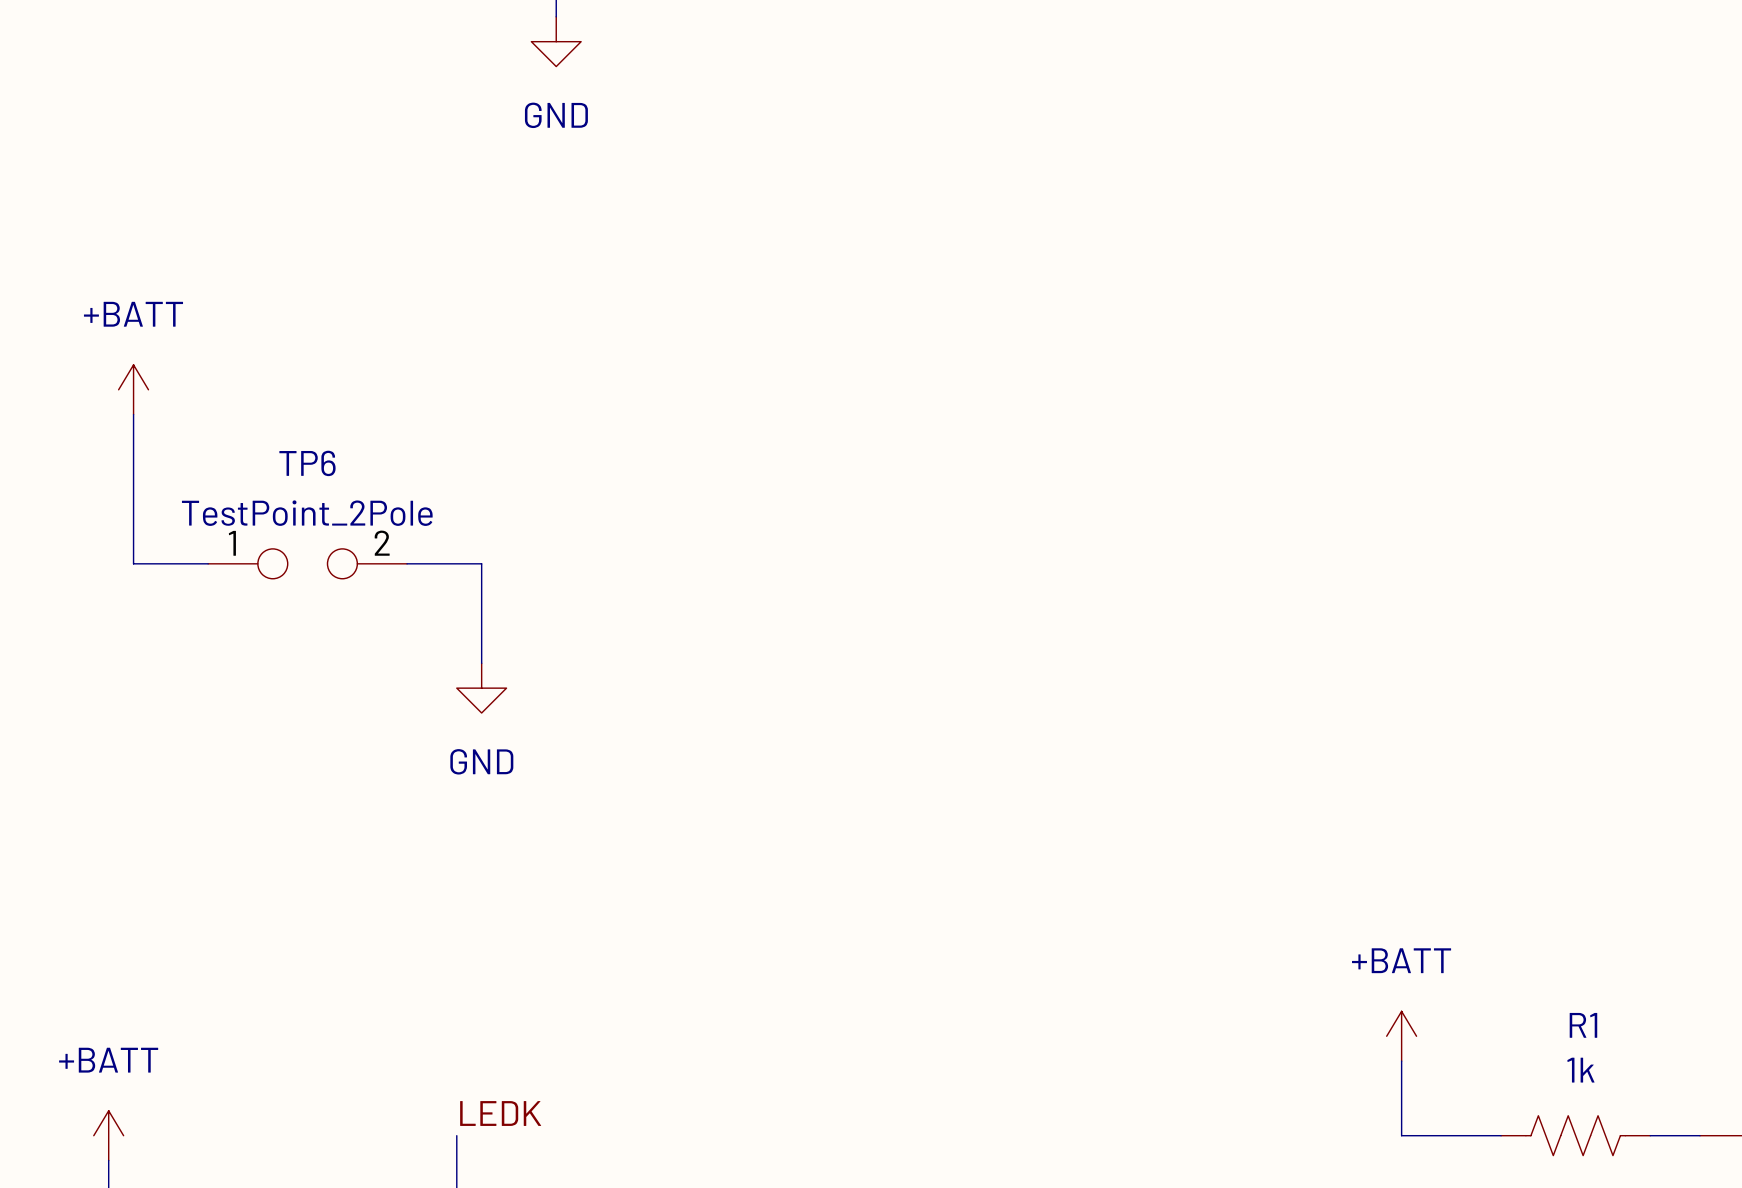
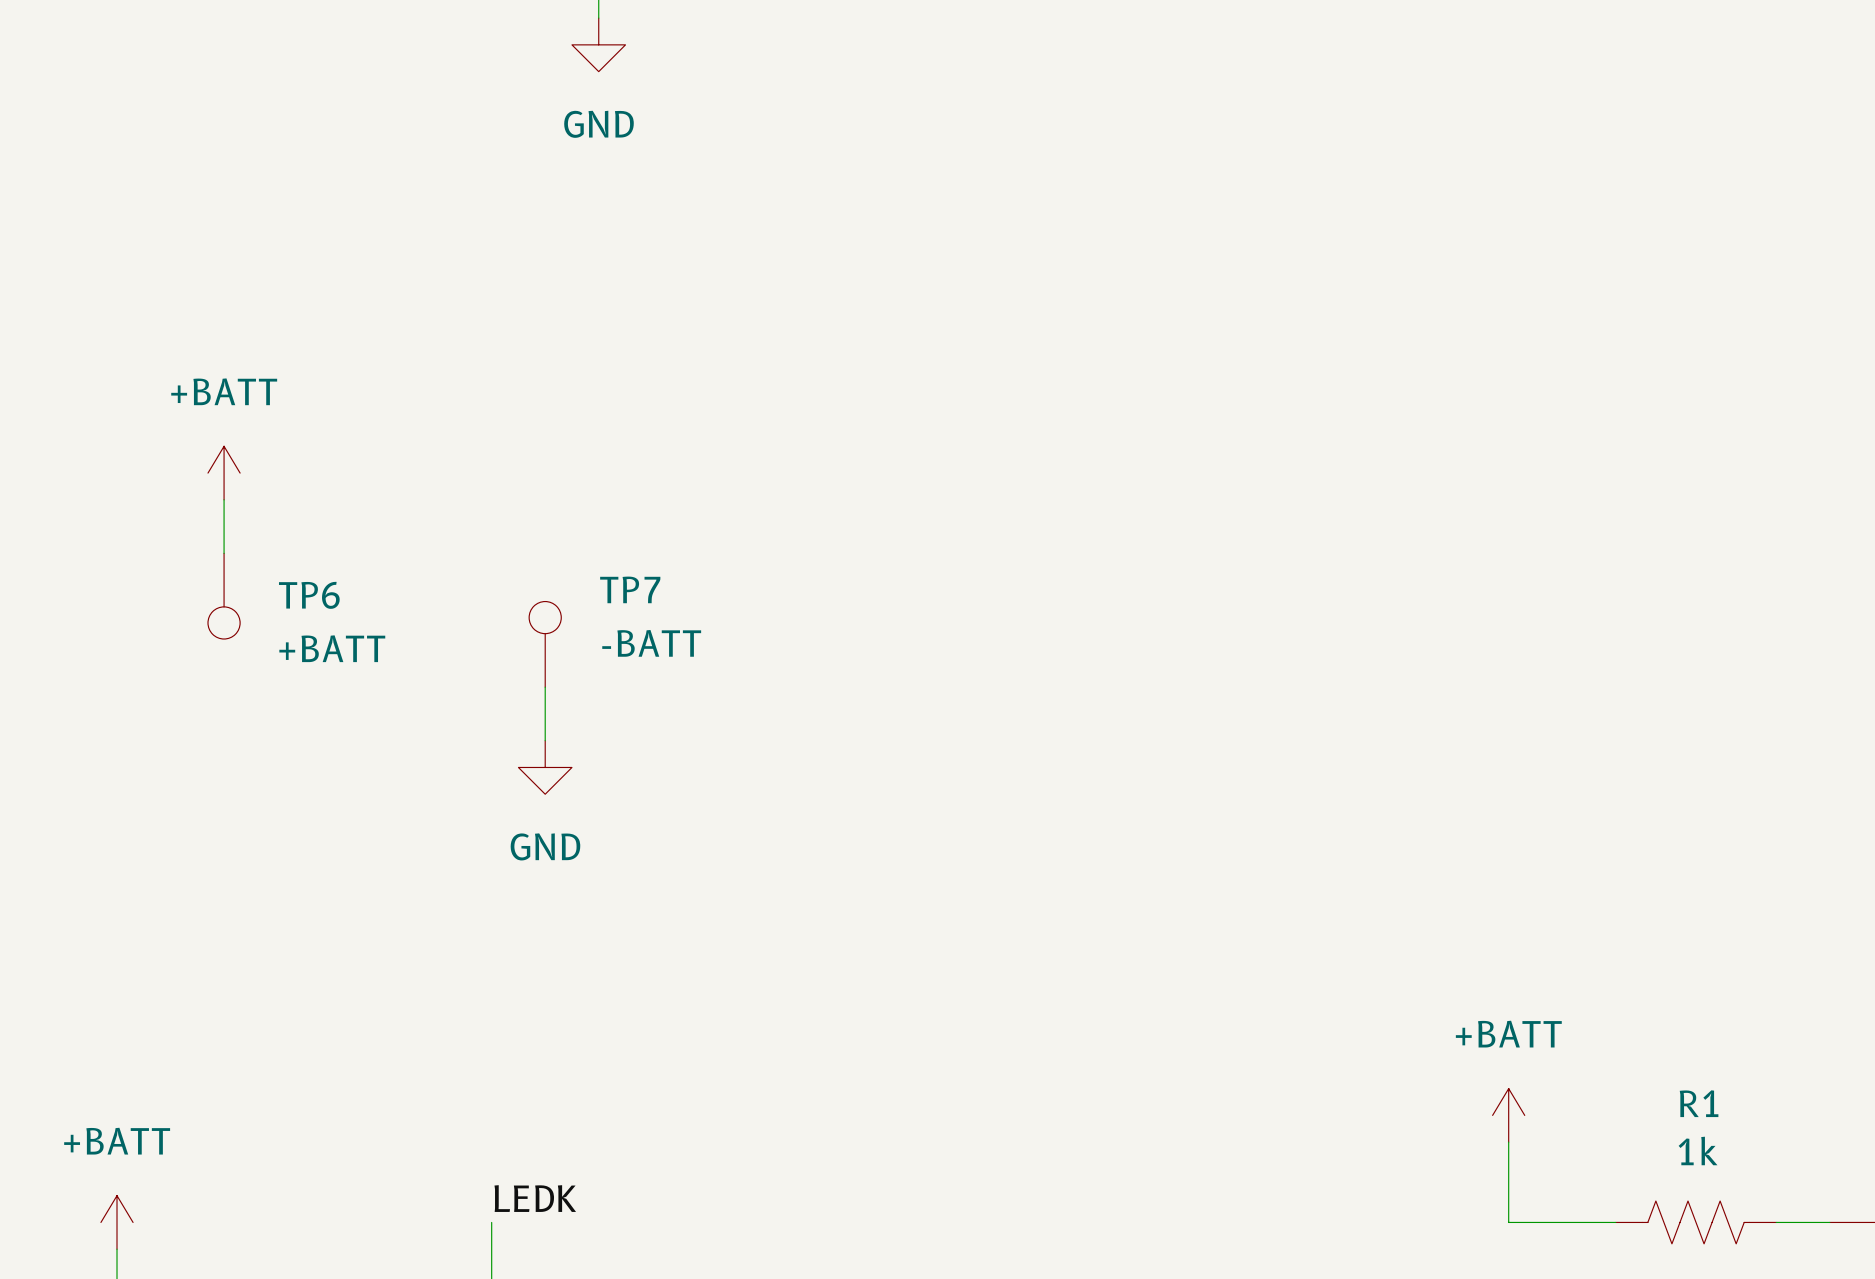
power symbol position: +BATT (133, 389) -> +BATT (224, 473)
wire: (133, 414) (133, 563) (208, 563) -> none
TP6 name position: TP6 (307, 463) -> TP6 (309, 595)
wire: none -> (224, 499) (224, 553)
TP6 value: TestPoint_2Pole (307, 513) -> +BATT (332, 648)
TP6 symbol: [208, 548, 408, 579] -> [207, 553, 241, 640]
wire: (407, 563) (481, 563) (481, 663) -> none
TP7: none -> -BATT (545, 644)
wire: none -> (545, 687) (545, 740)
power symbol position: GND (481, 688) -> GND (545, 767)

